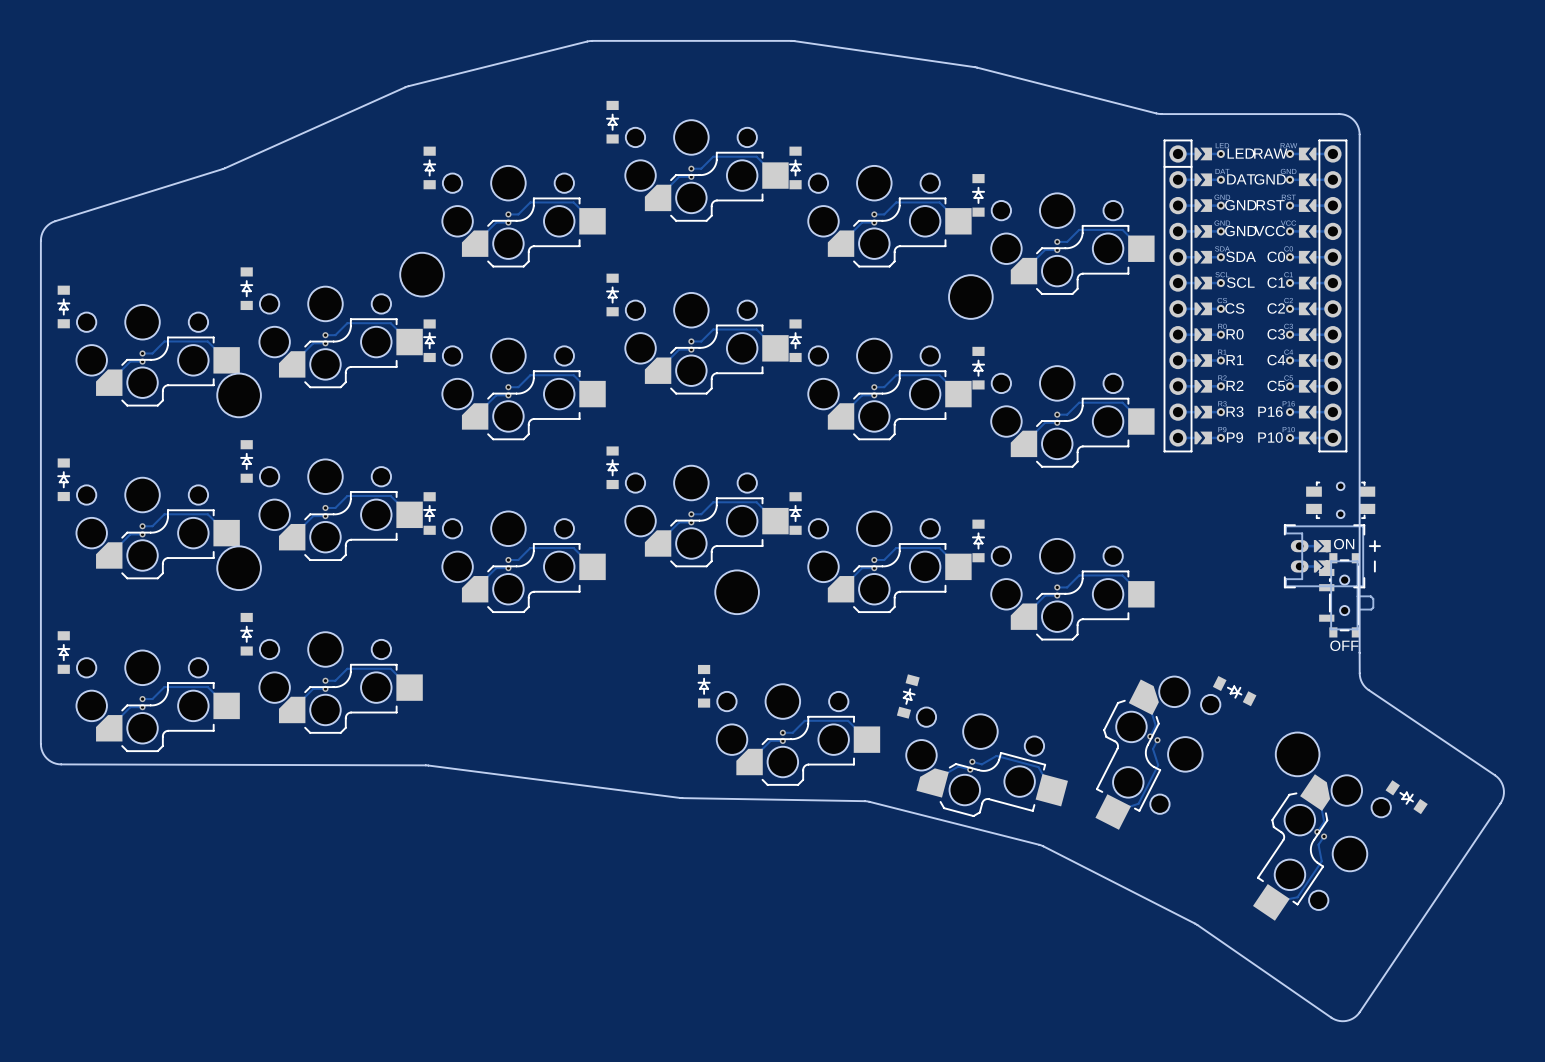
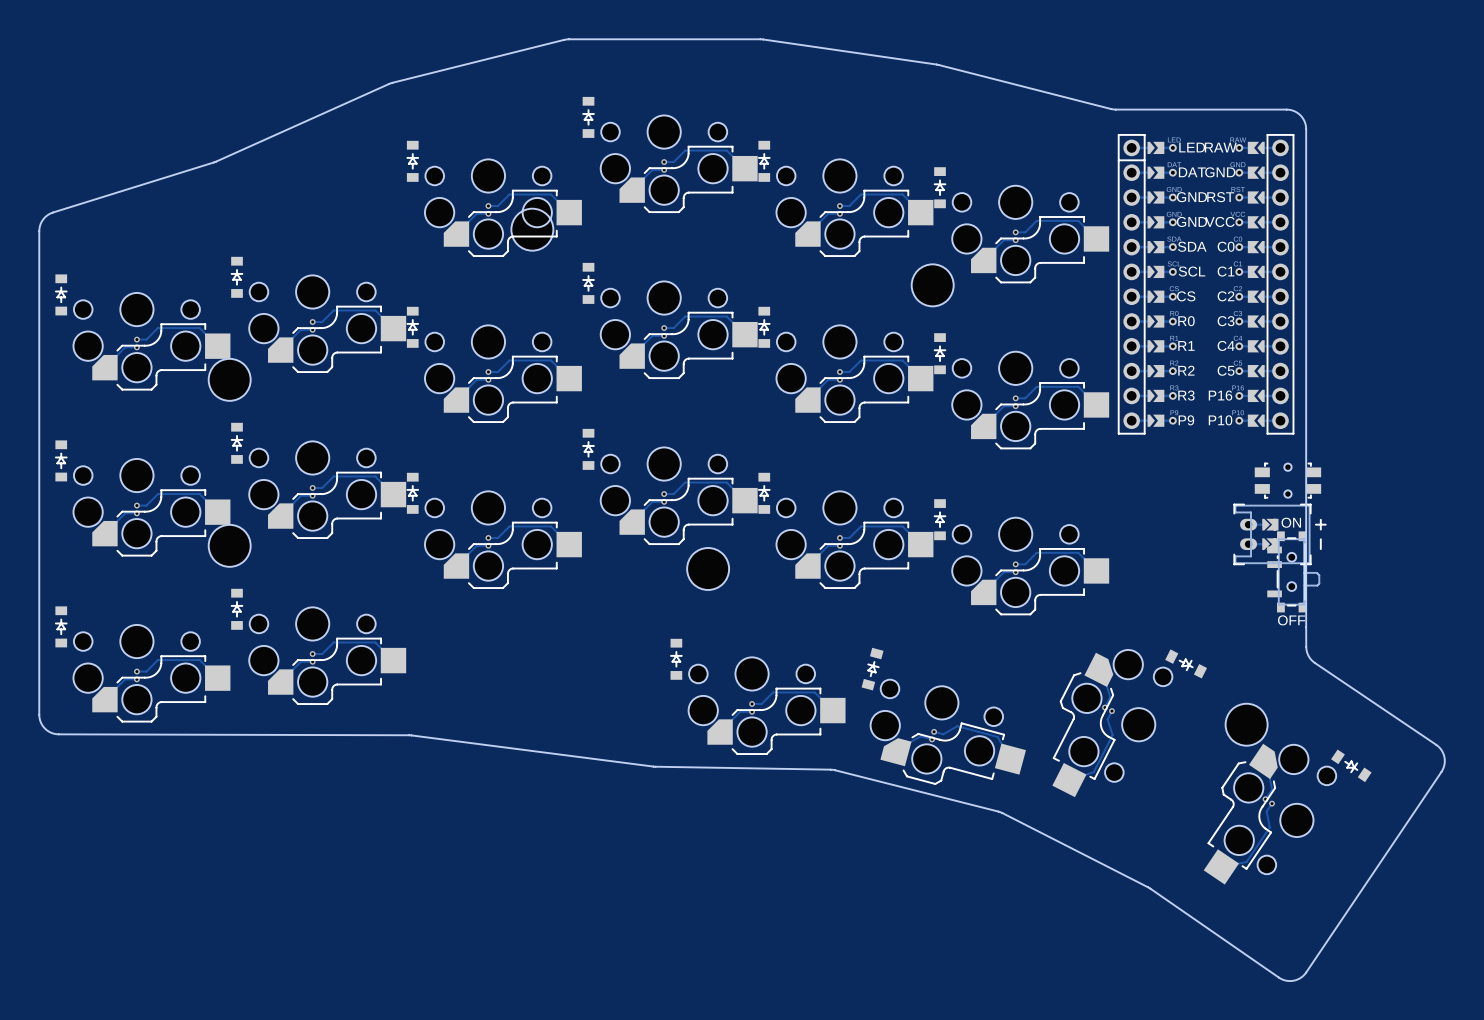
part position: (422, 274) -> (532, 229)

